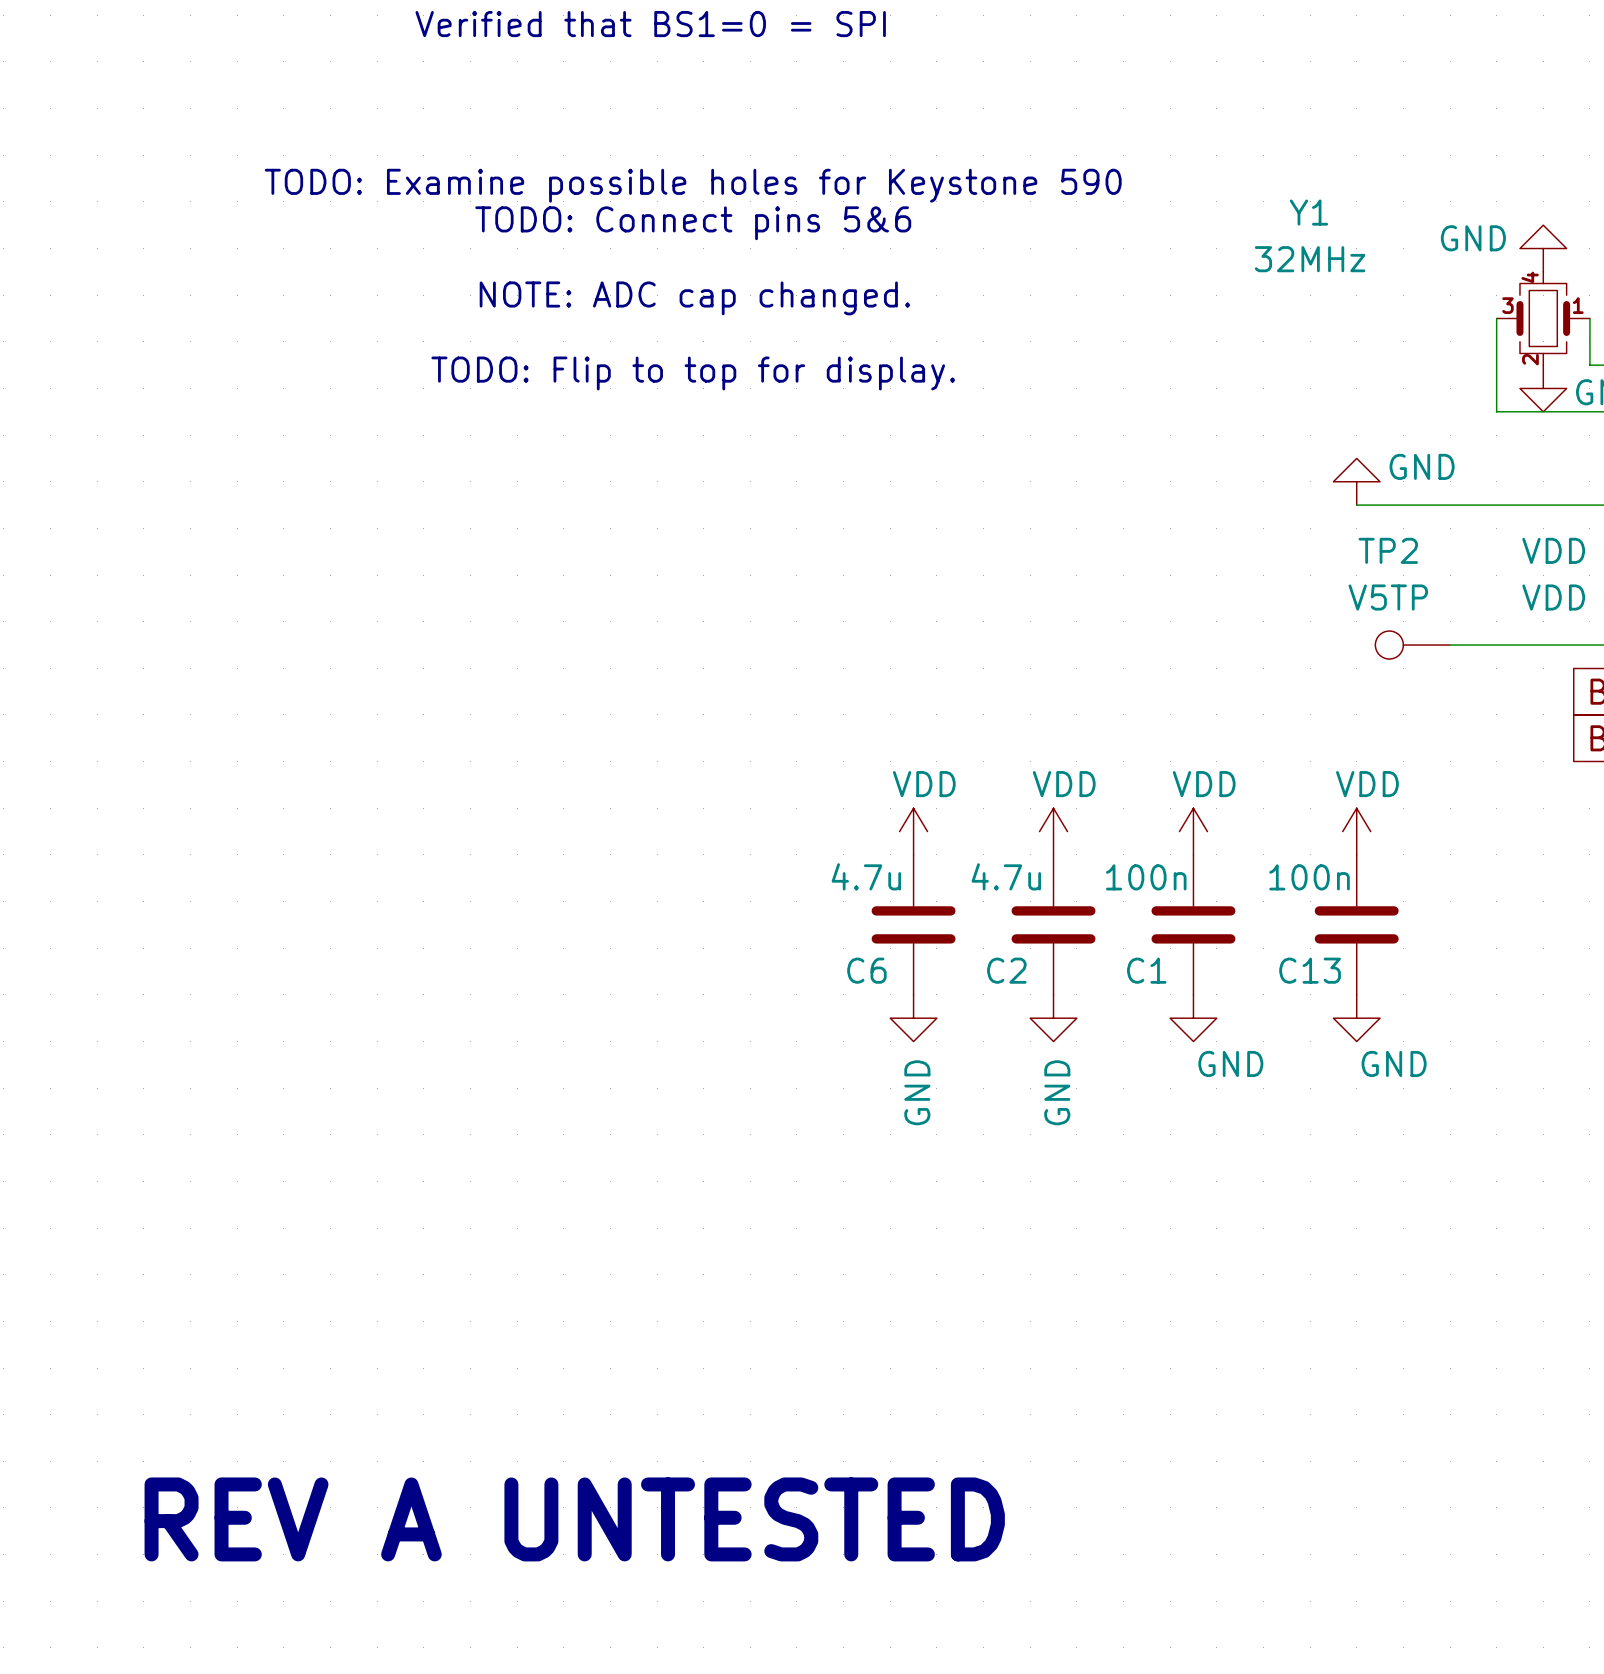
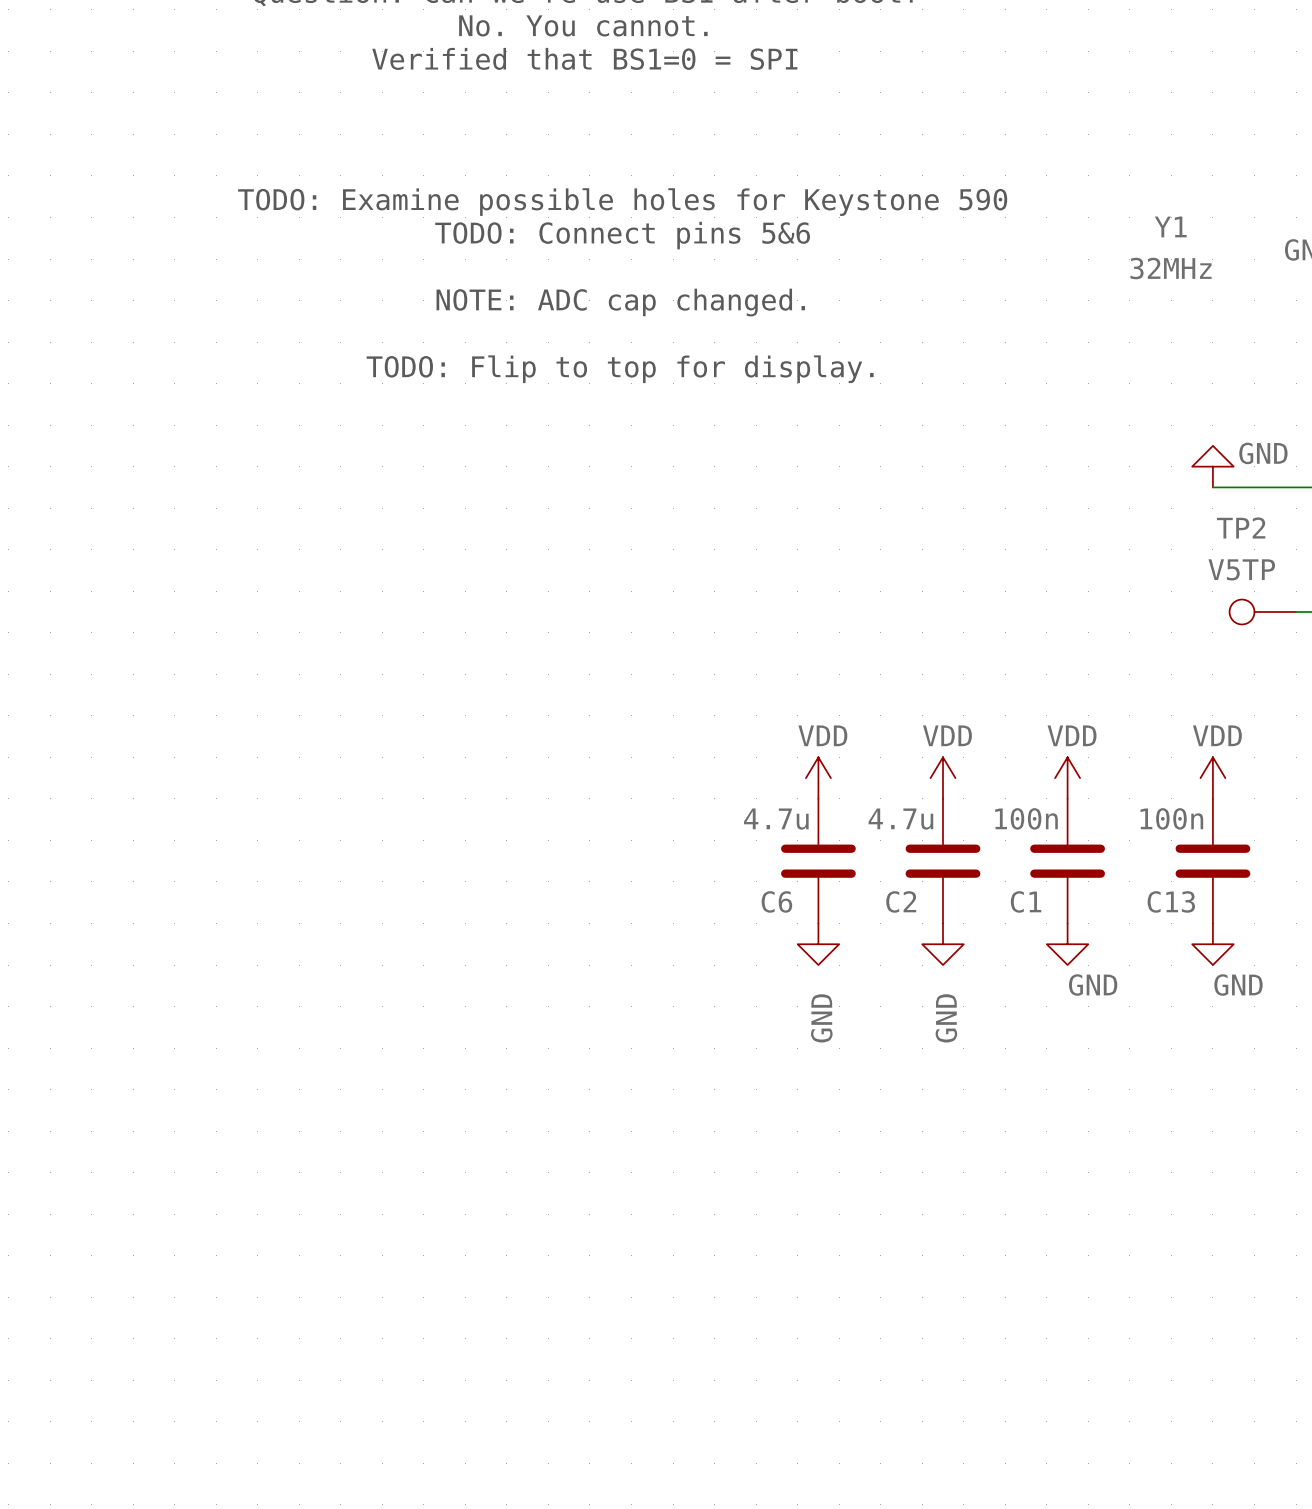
text: REV A UNTESTED (574, 1519) -> none

